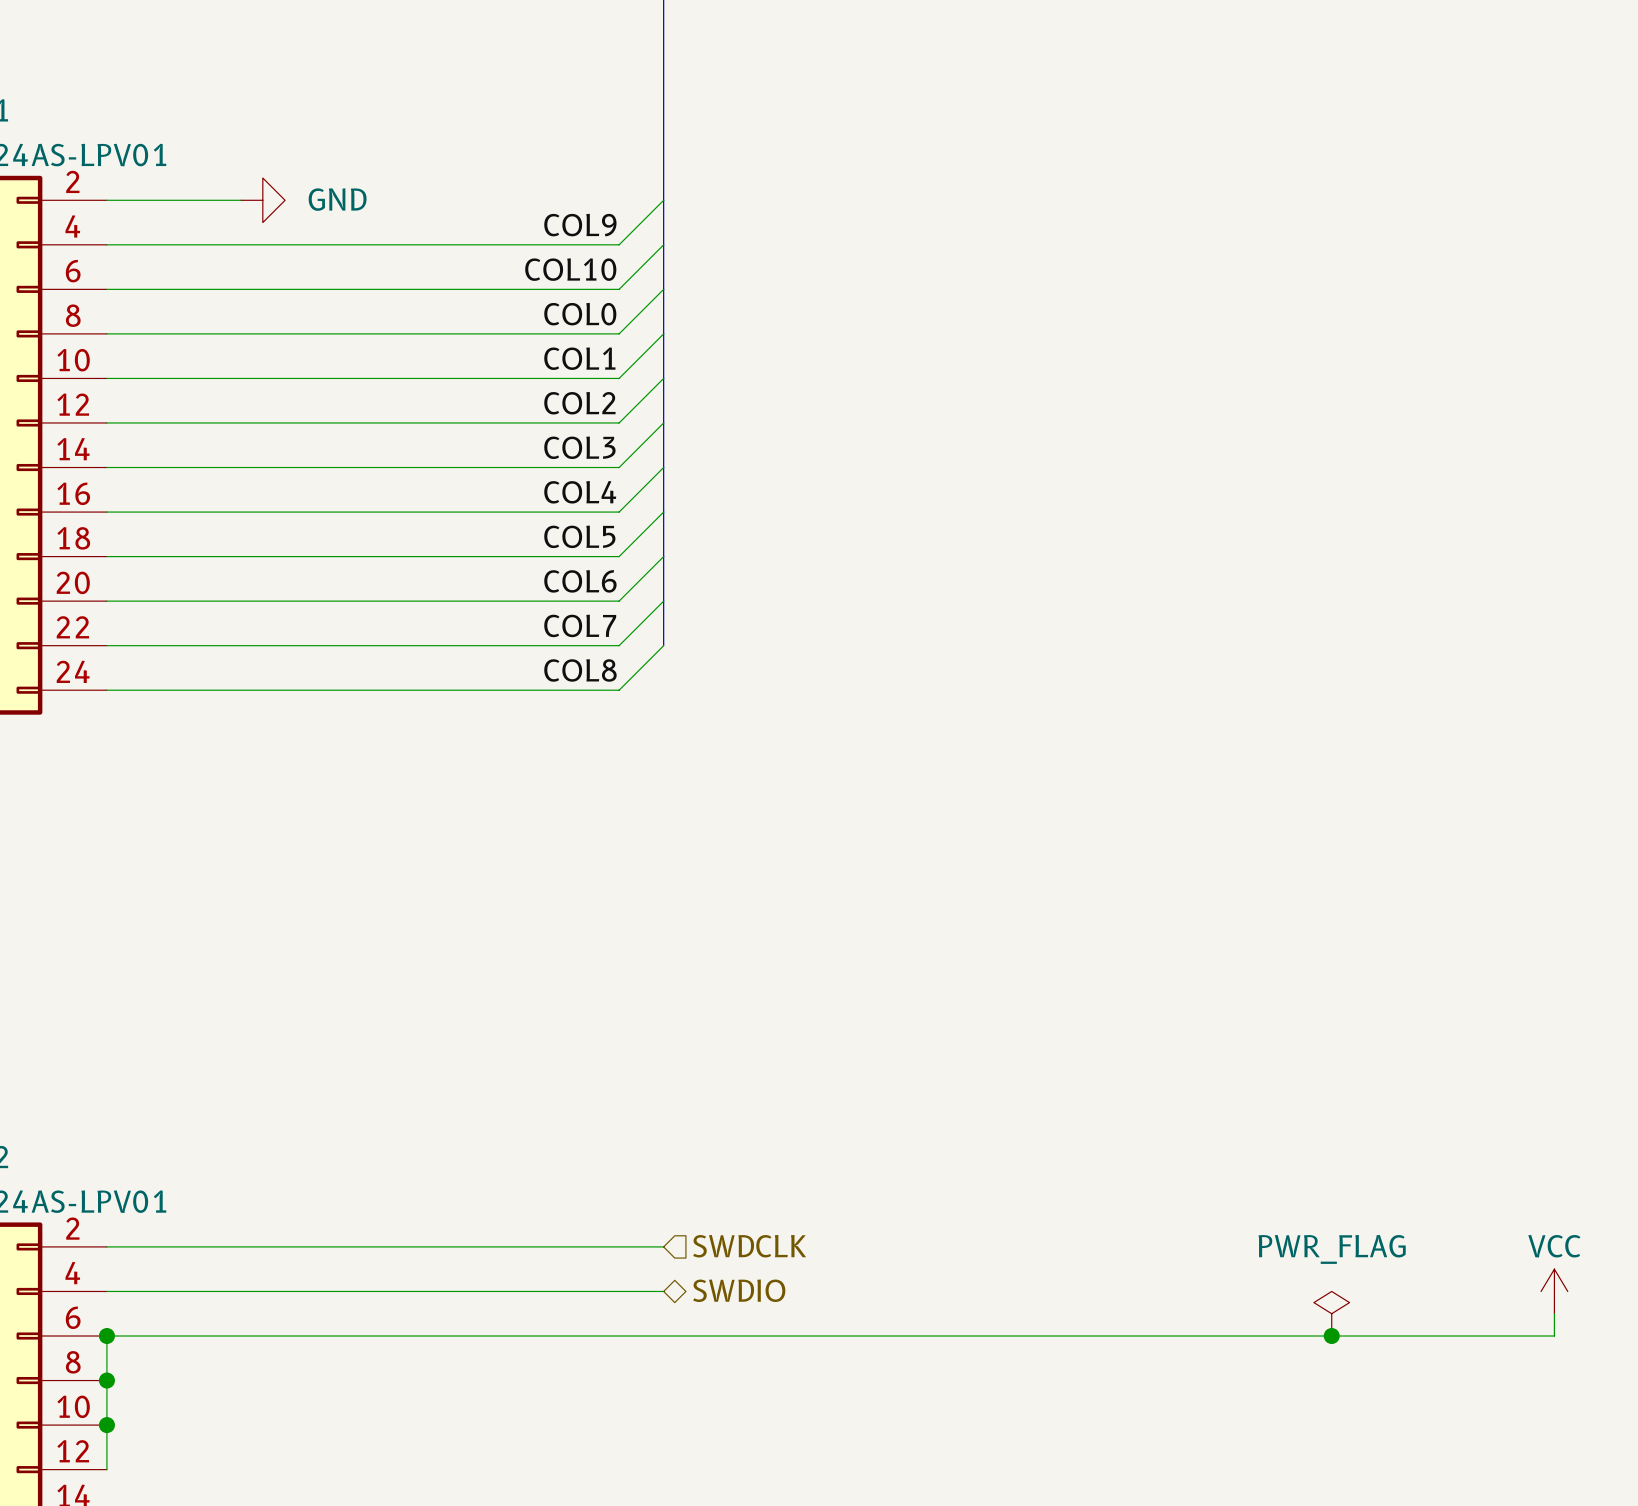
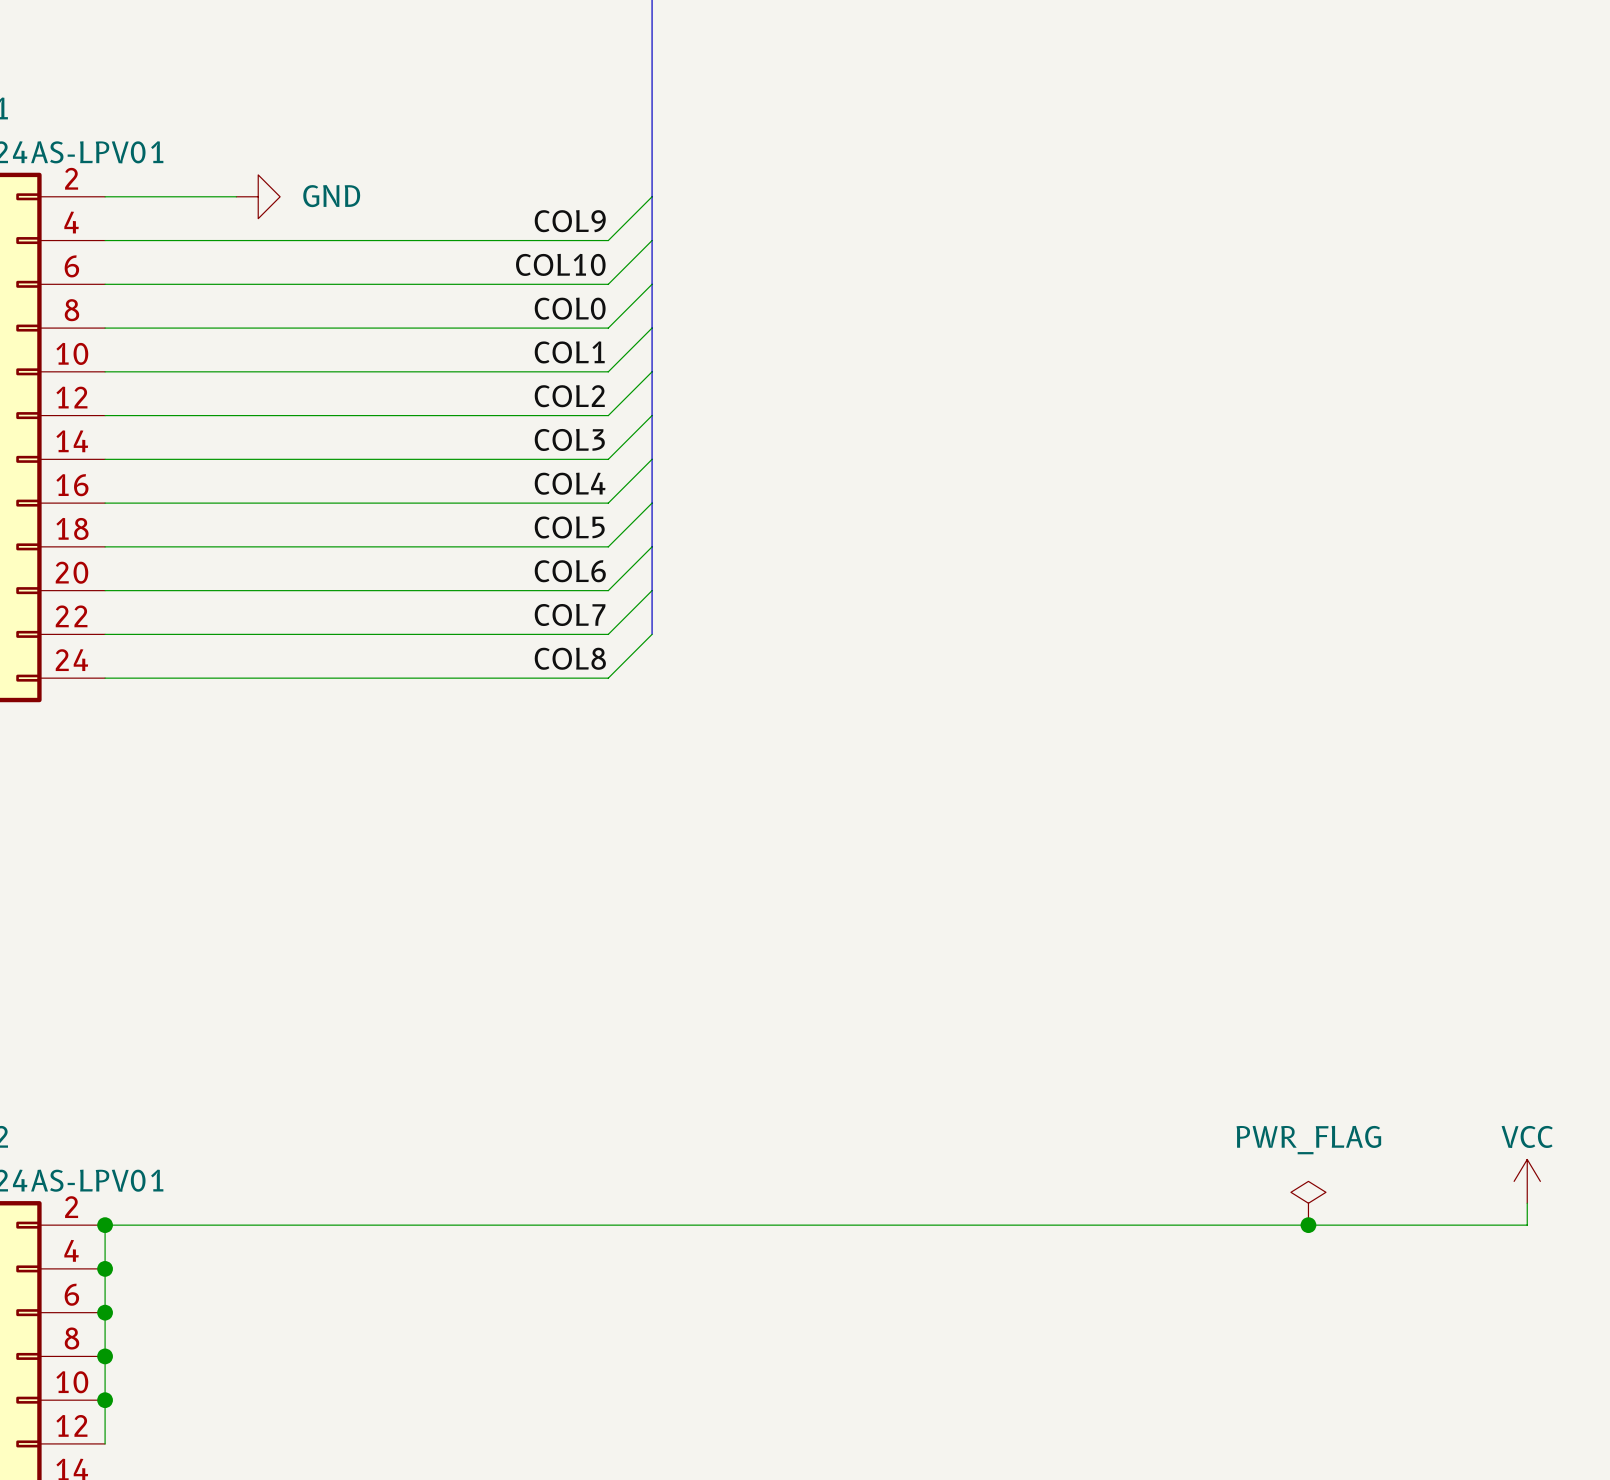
wire: none -> (1527, 1203) (1527, 1225) (652, 1225)
junction: none -> (105, 1225)
hierarchical label: SWDCLK (749, 1246) -> none
hierarchical label: SWDIO (739, 1290) -> none
wire: (106, 1291) (663, 1291) -> none
junction: none -> (105, 1268)
power symbol position: VCC (1554, 1291) -> VCC (1527, 1181)
power symbol position: PWR_FLAG (1331, 1313) -> PWR_FLAG (1308, 1203)
wire: (1554, 1313) (1554, 1336) (106, 1336) -> (105, 1225) (105, 1312)
junction position: (1331, 1336) -> (1308, 1225)

